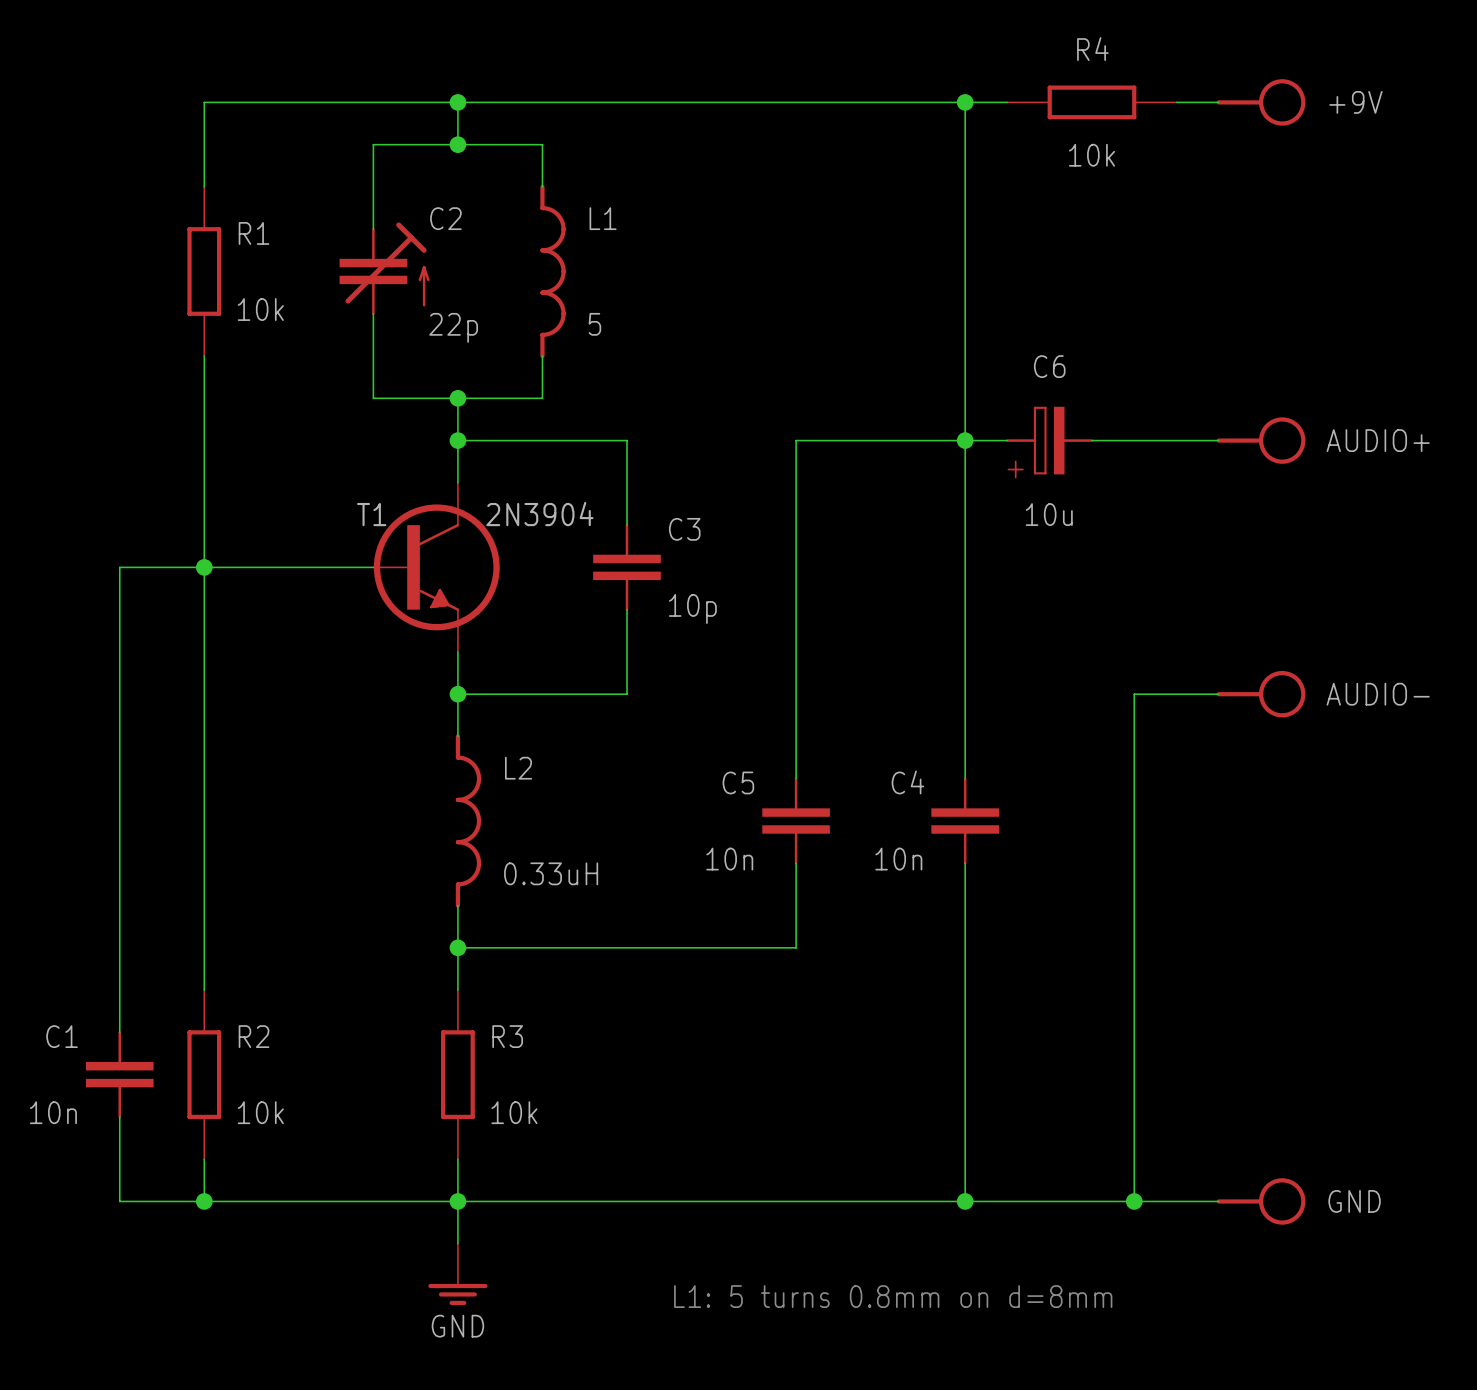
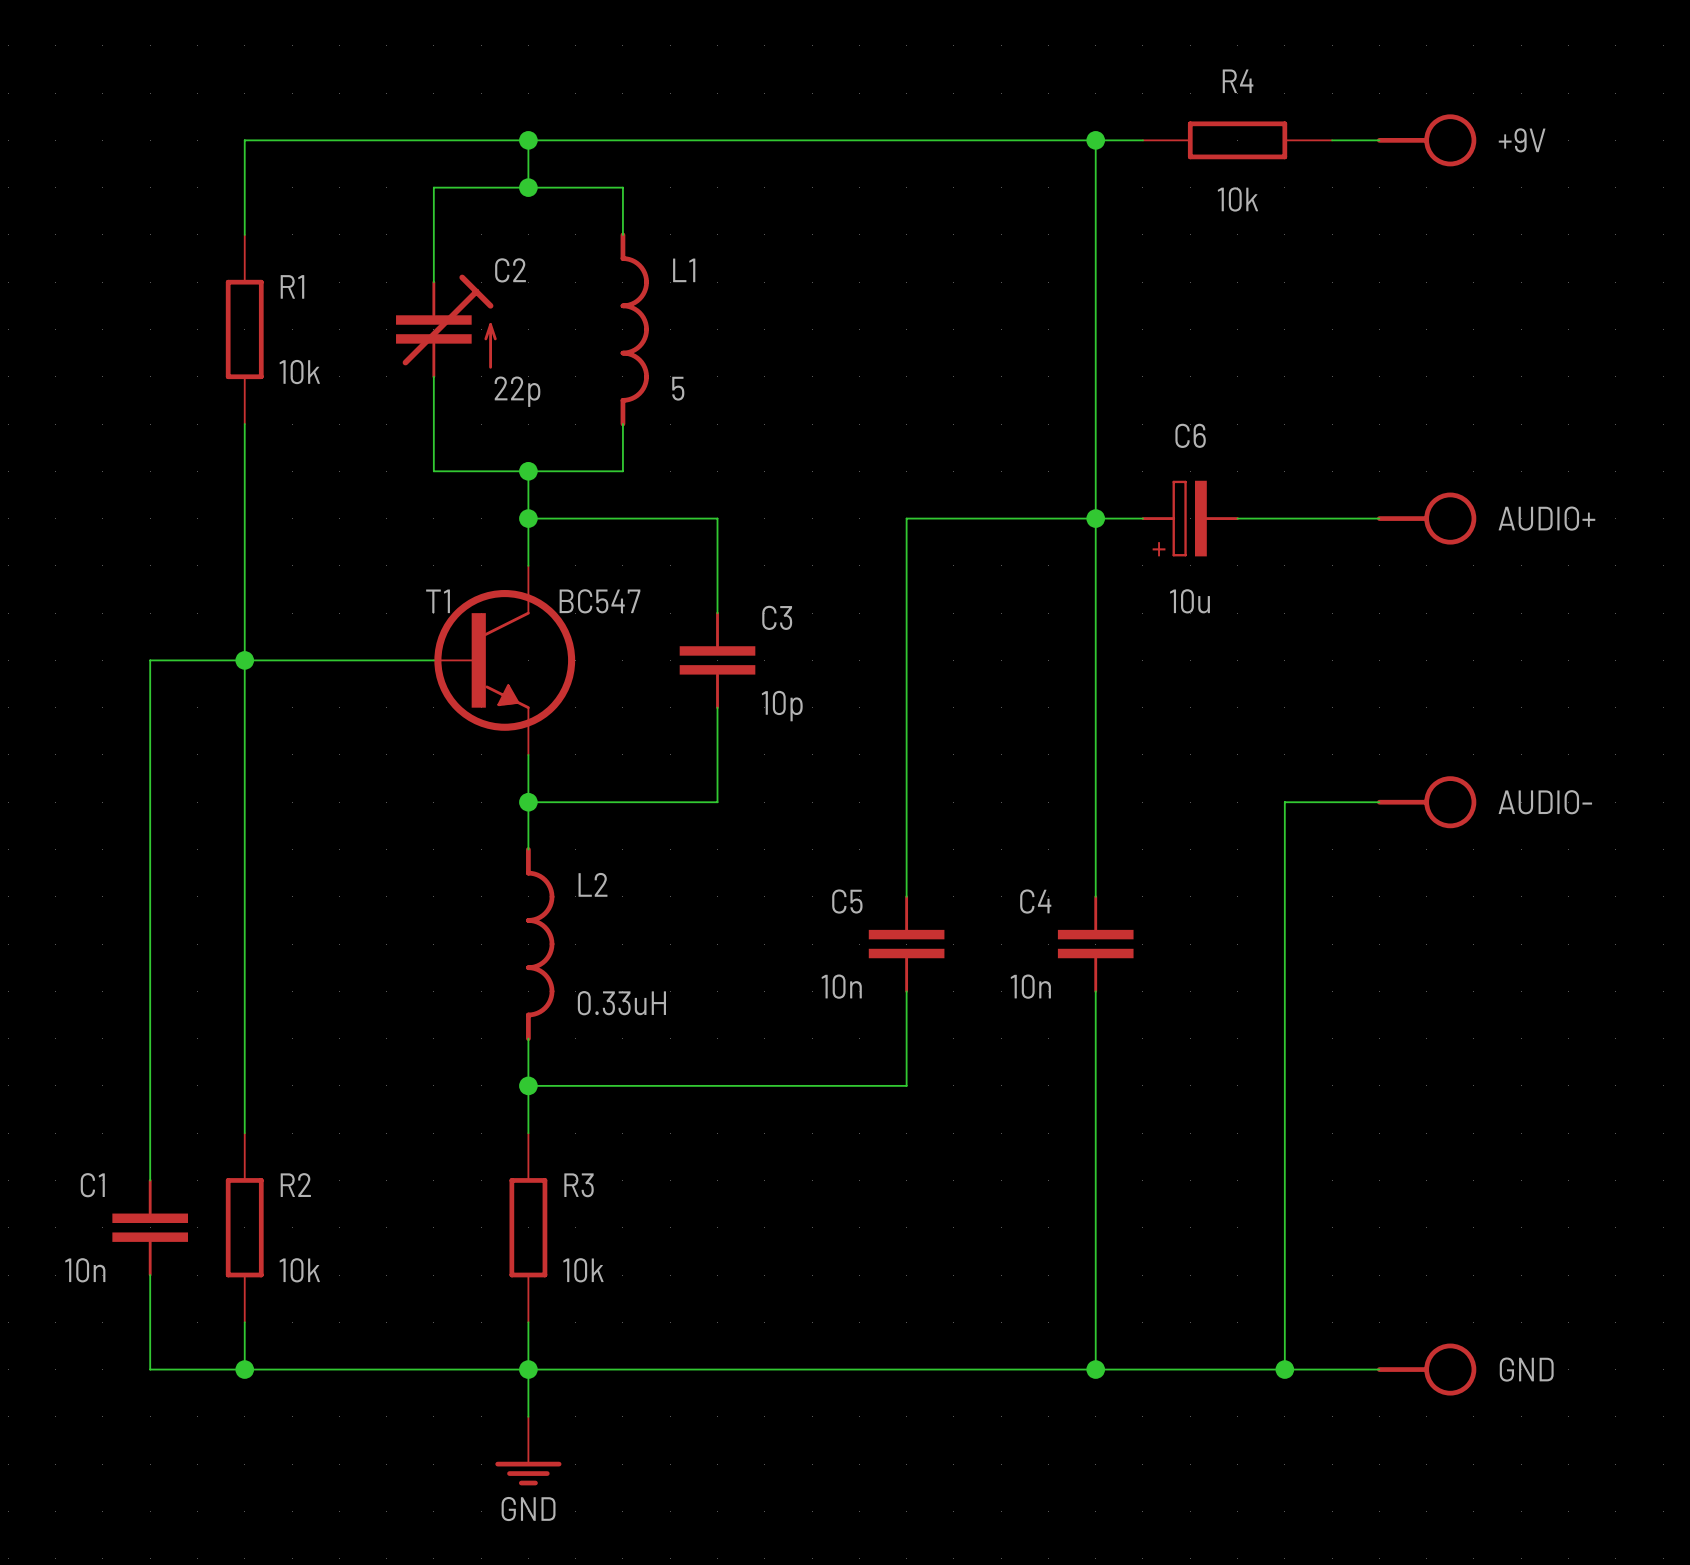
T1 value: 2N3904 (539, 514) -> BC547 (599, 601)
text: L1: 5 turns 0.8mm on d=8mm (893, 1296) -> none

